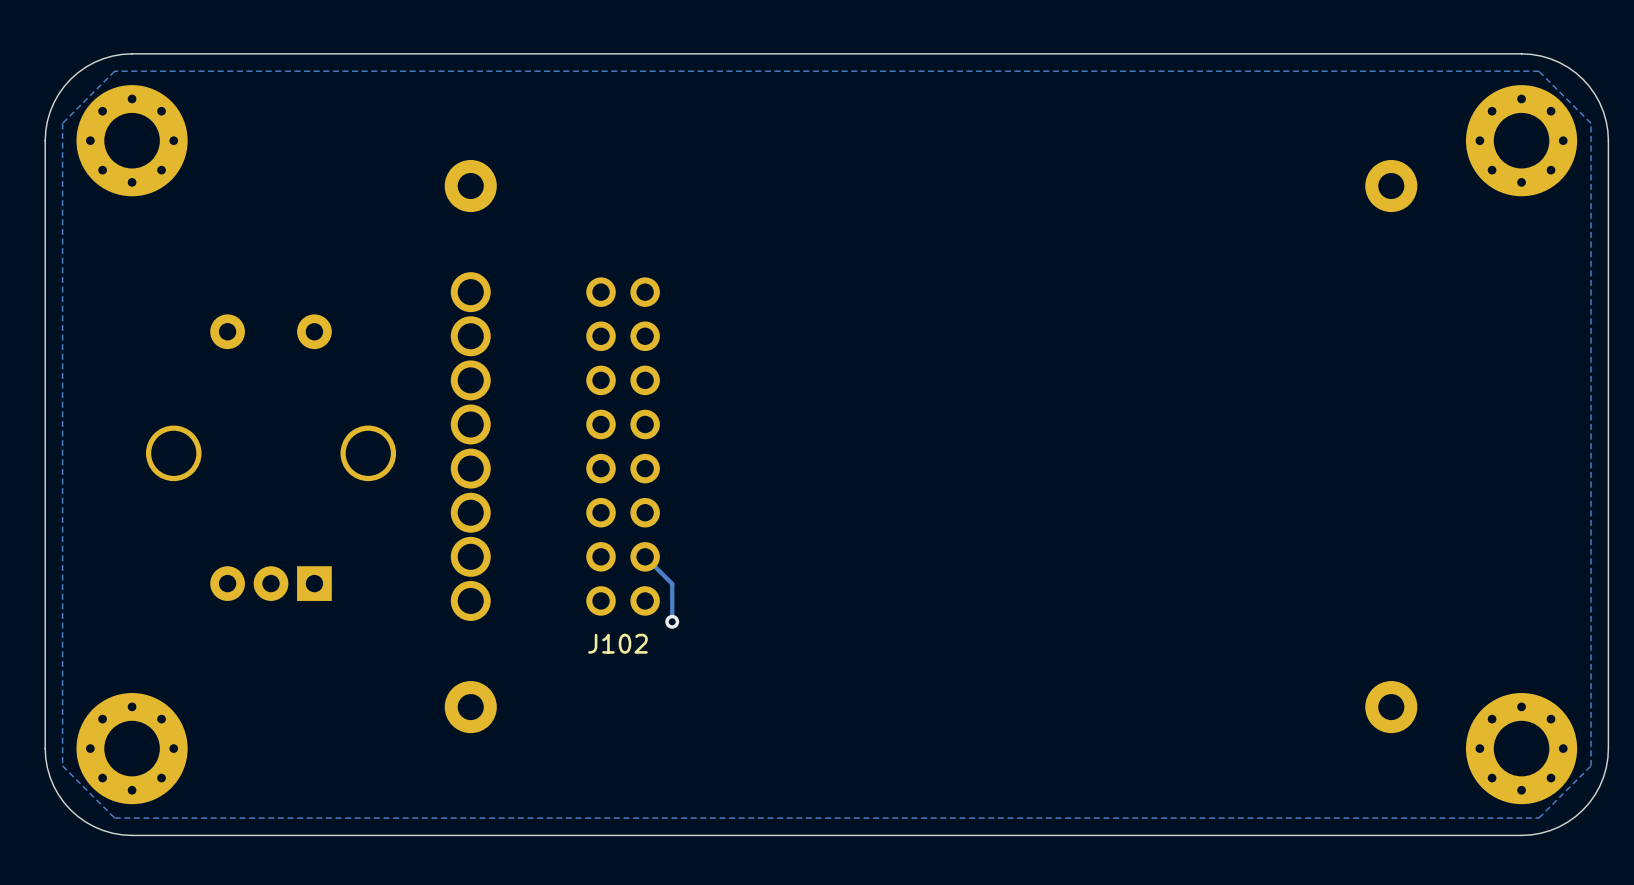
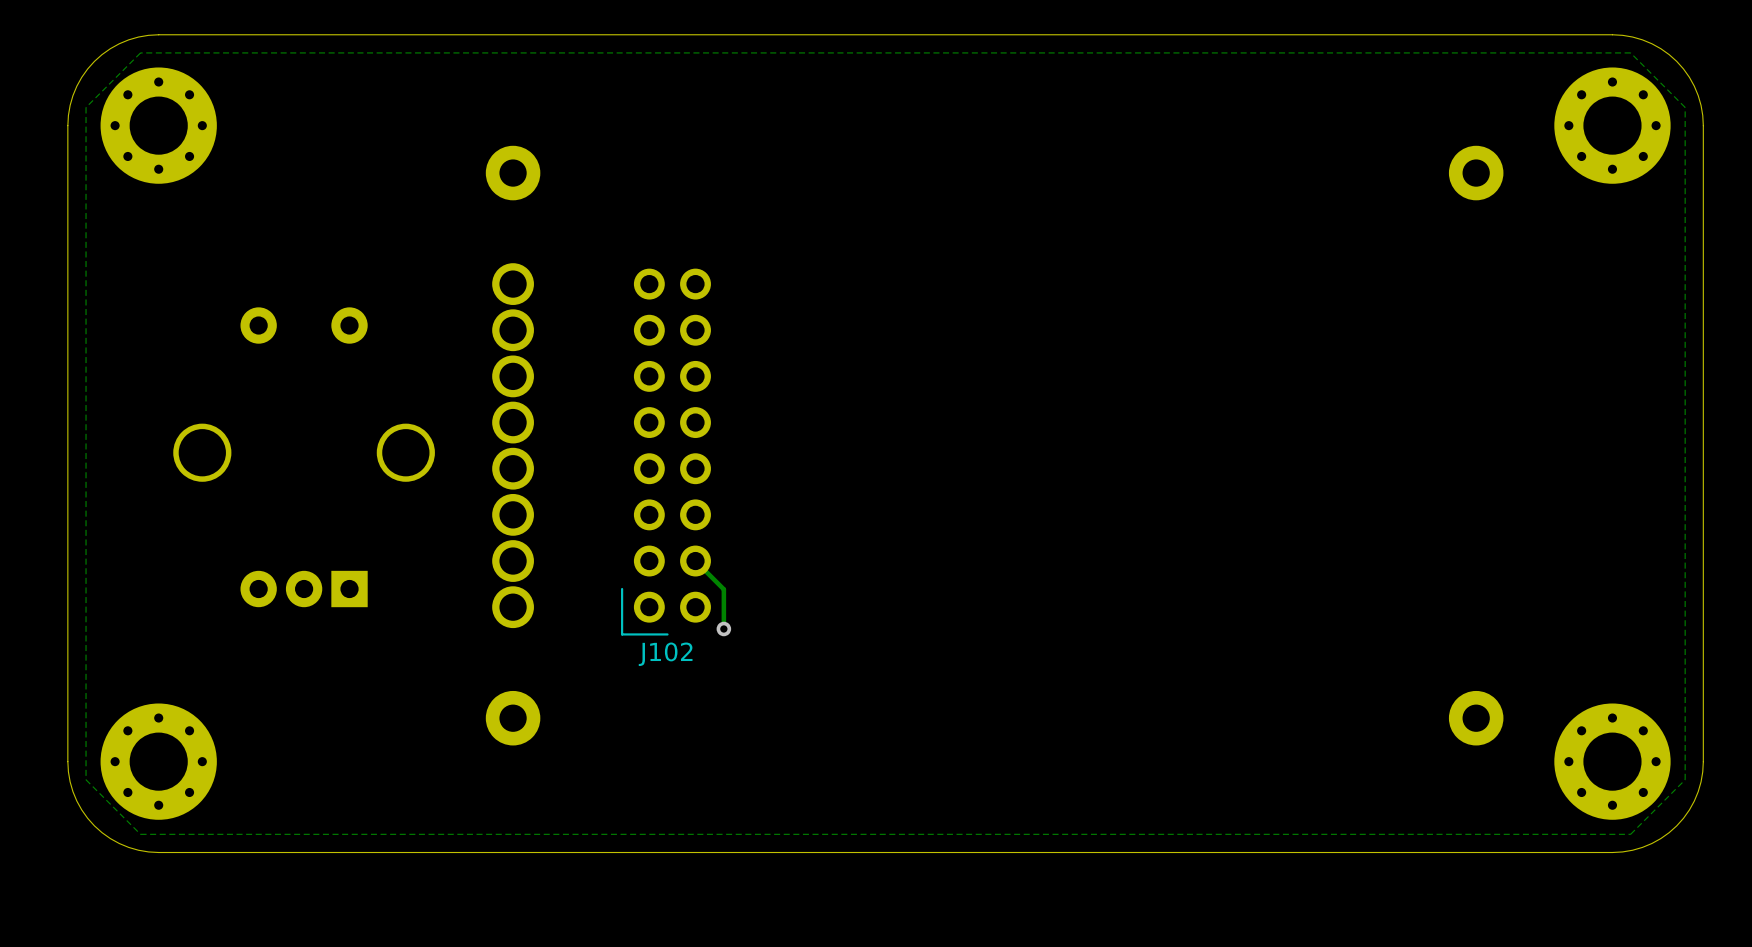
line: none -> (622, 589) (622, 634) (667, 634)

